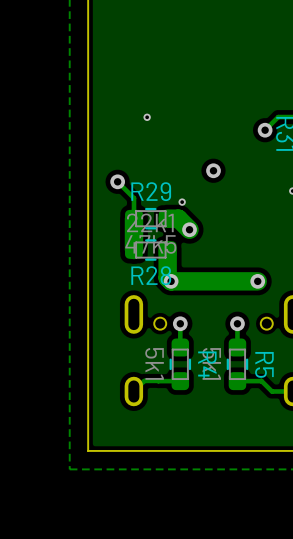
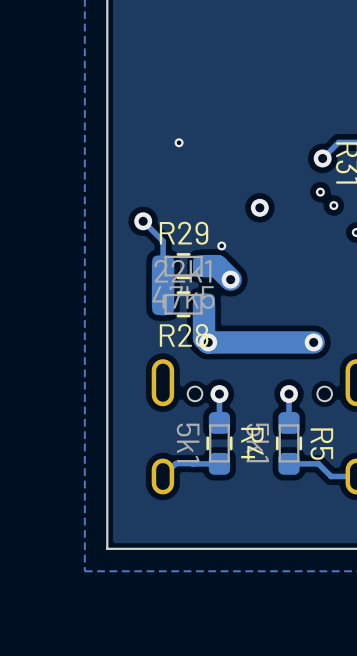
via: none -> (320, 192)
via: none -> (333, 205)

